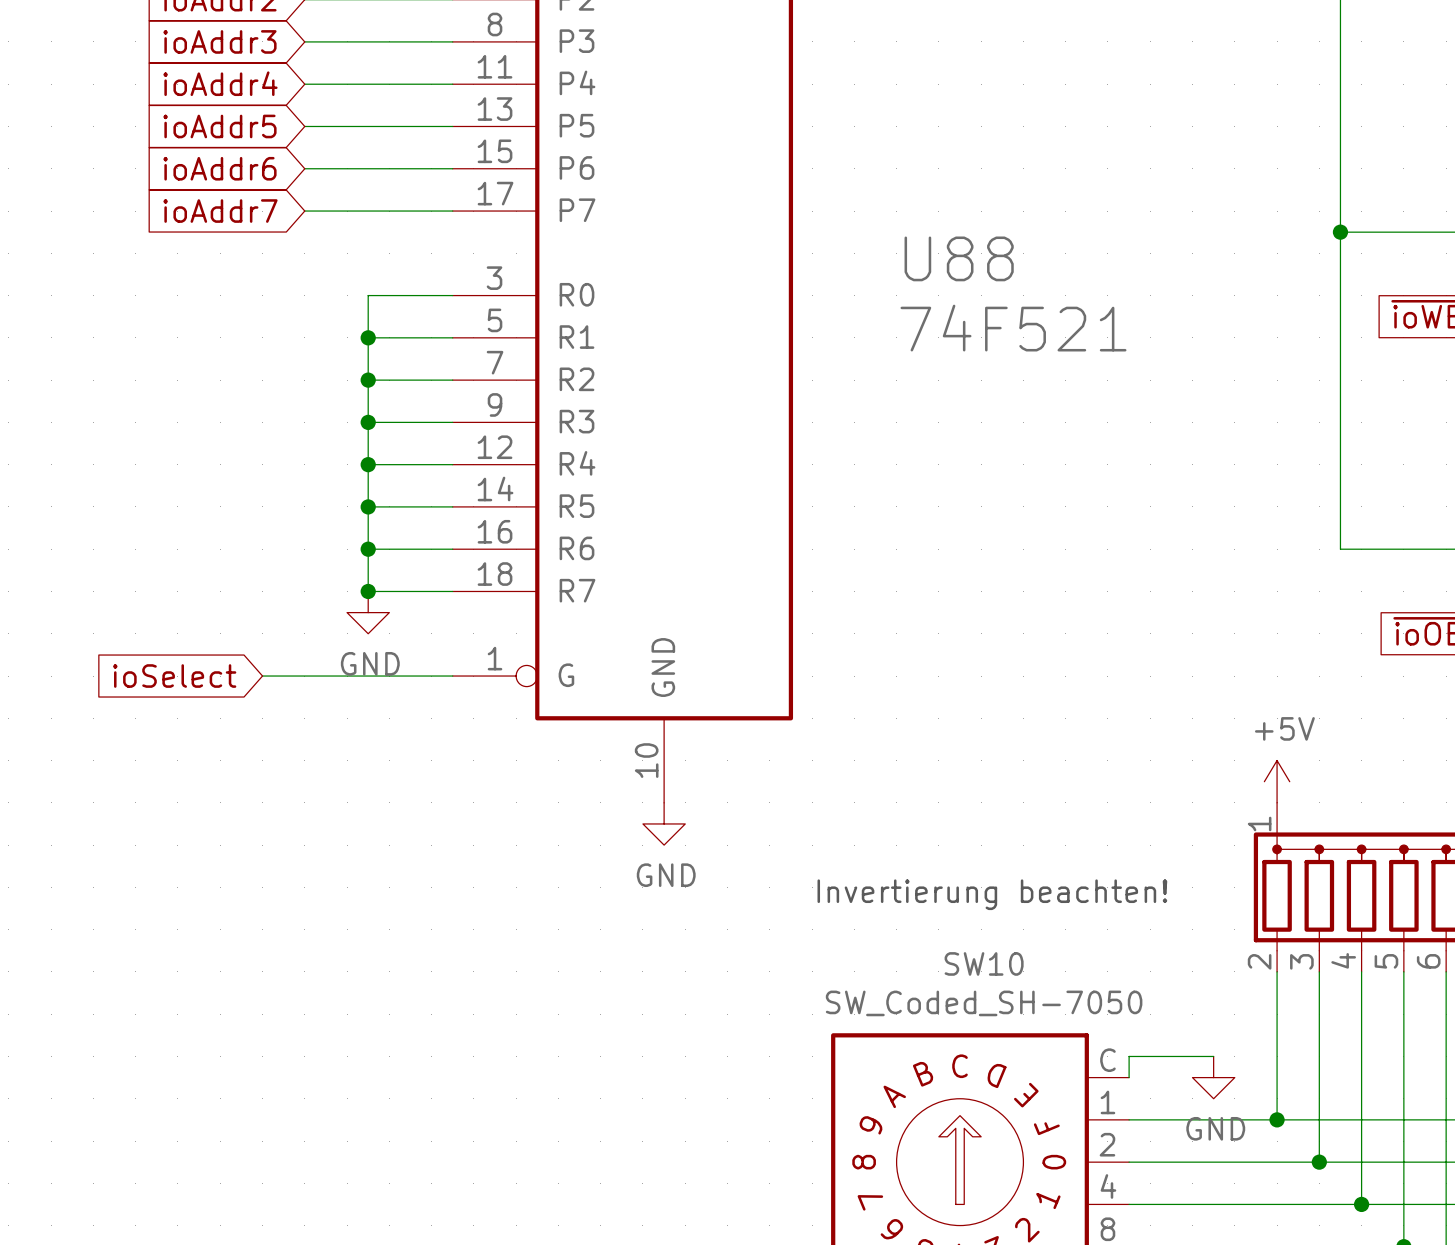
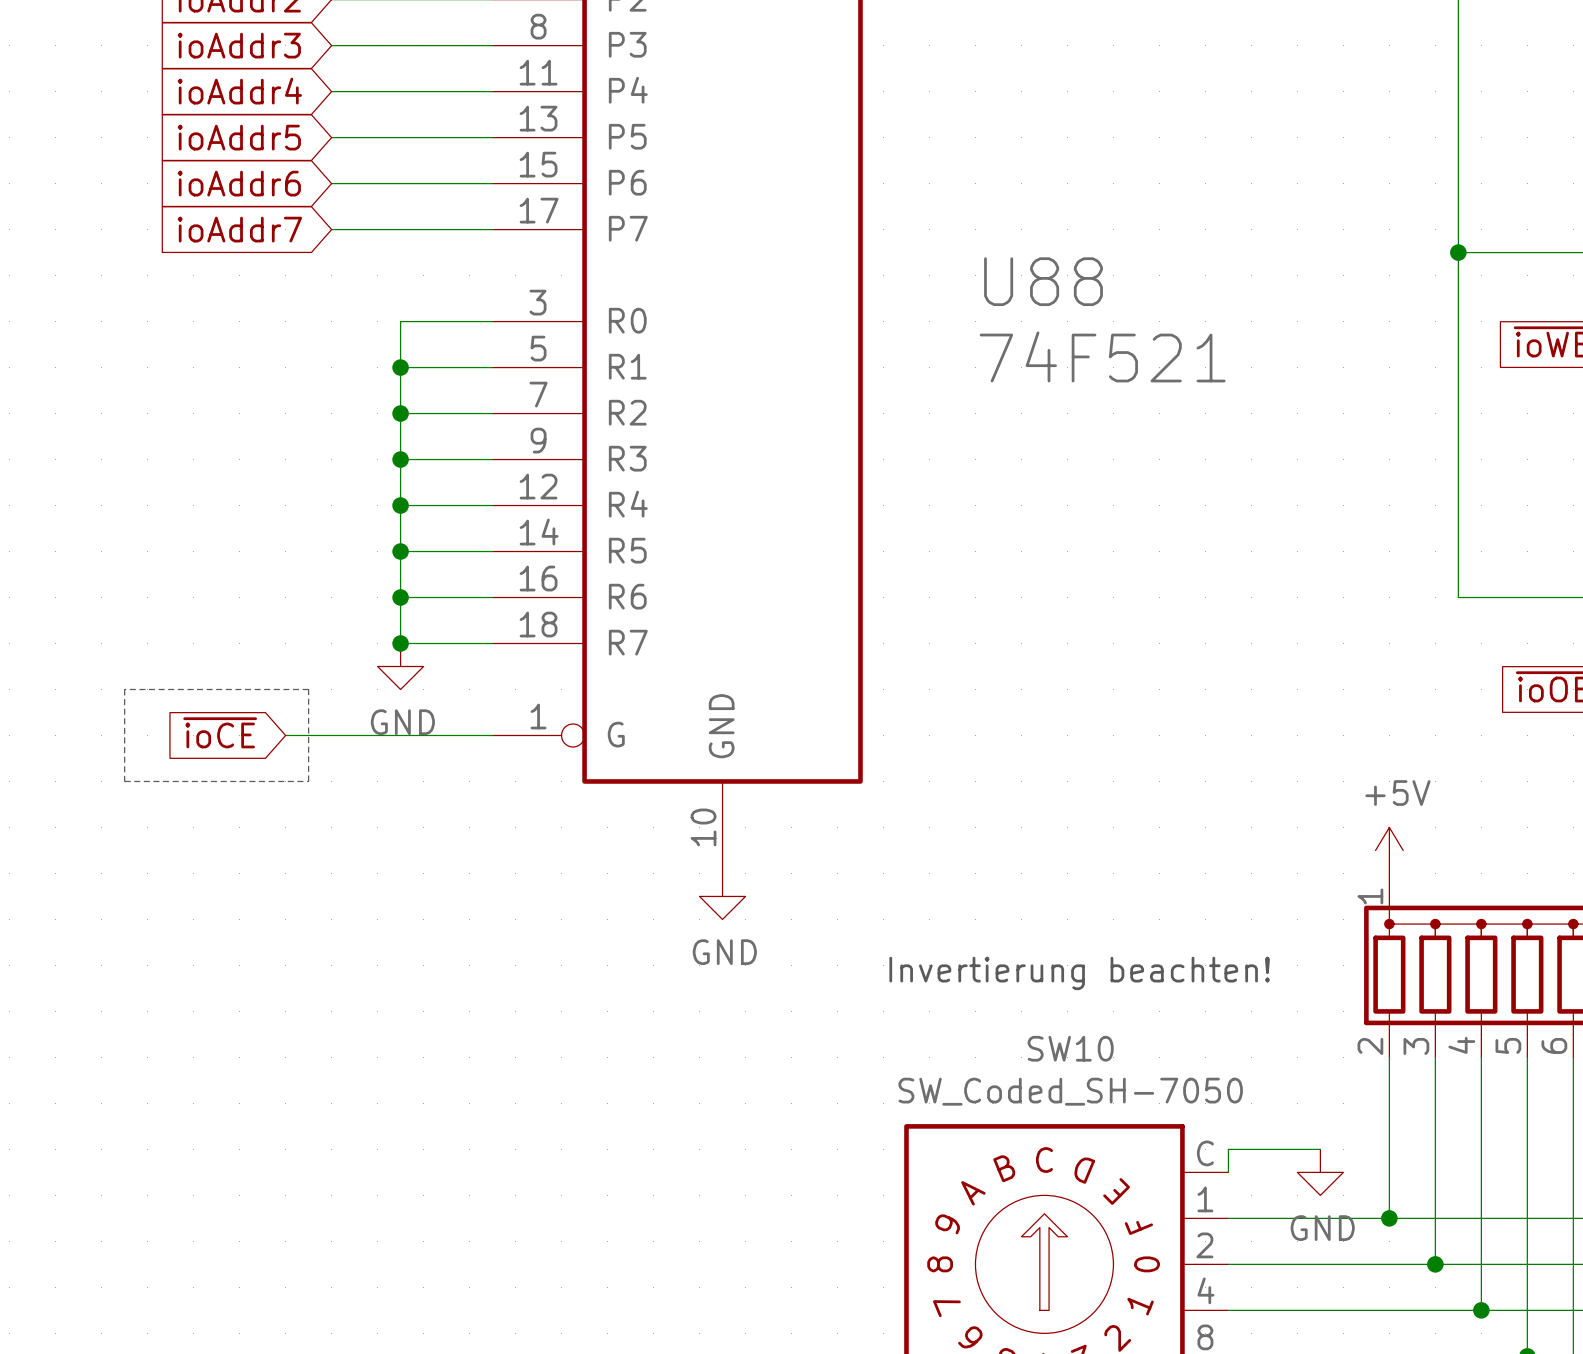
line: none -> (124, 689) (308, 689) (308, 781) (124, 781) (124, 689)
global label: ioSelect (174, 676) -> ~{ioCE} (220, 732)

